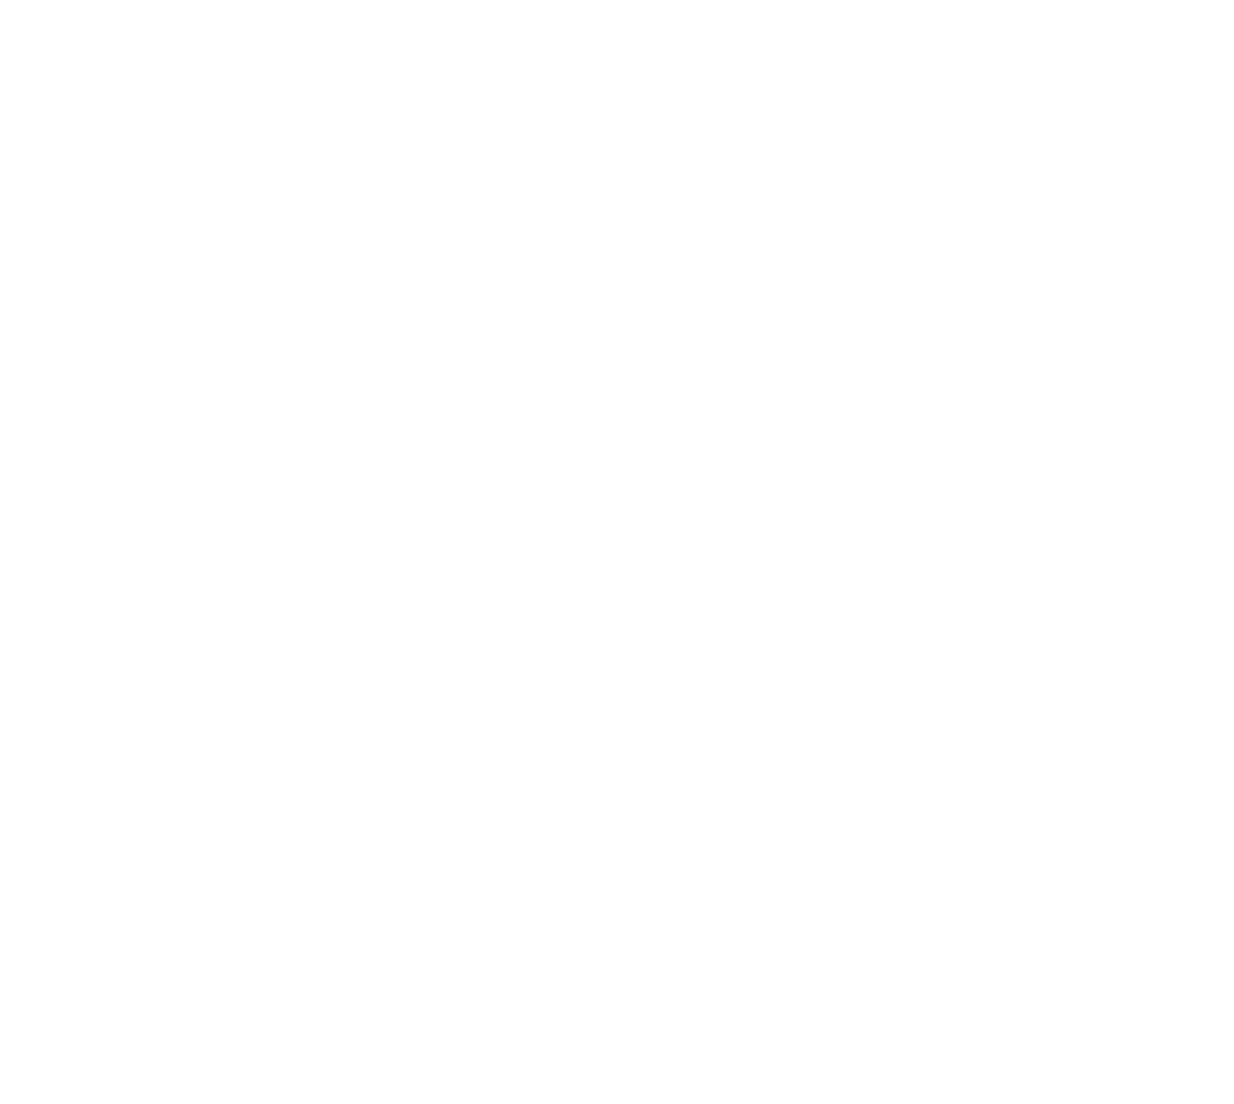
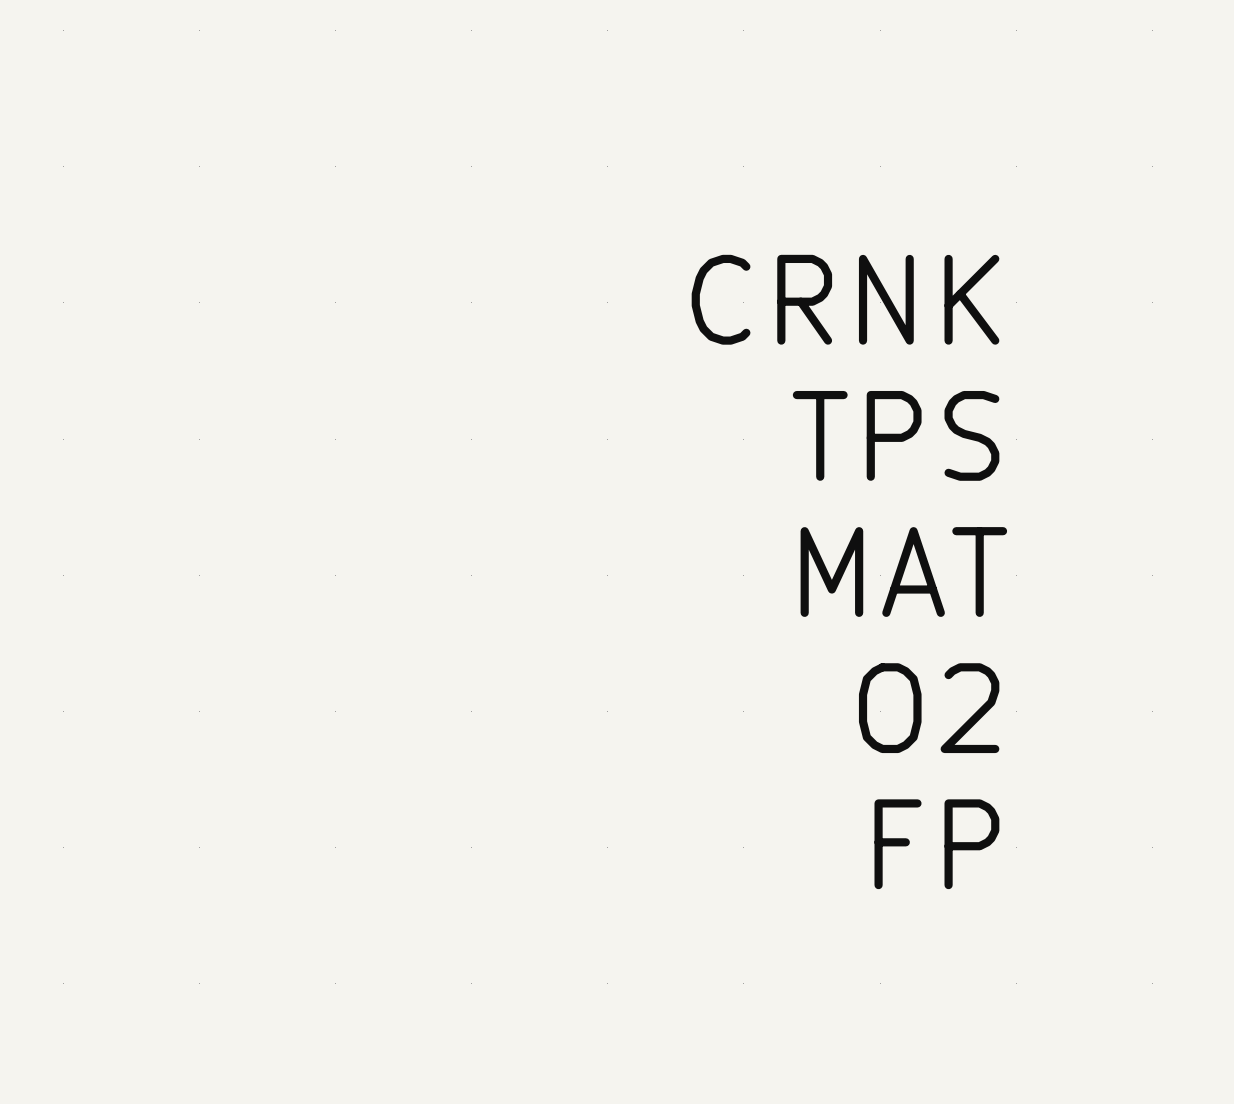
label: none -> CRNK (845, 299)
label: none -> TPS (896, 435)
label: none -> MAT (903, 572)
label: none -> O2 (929, 708)
label: none -> FP (936, 844)

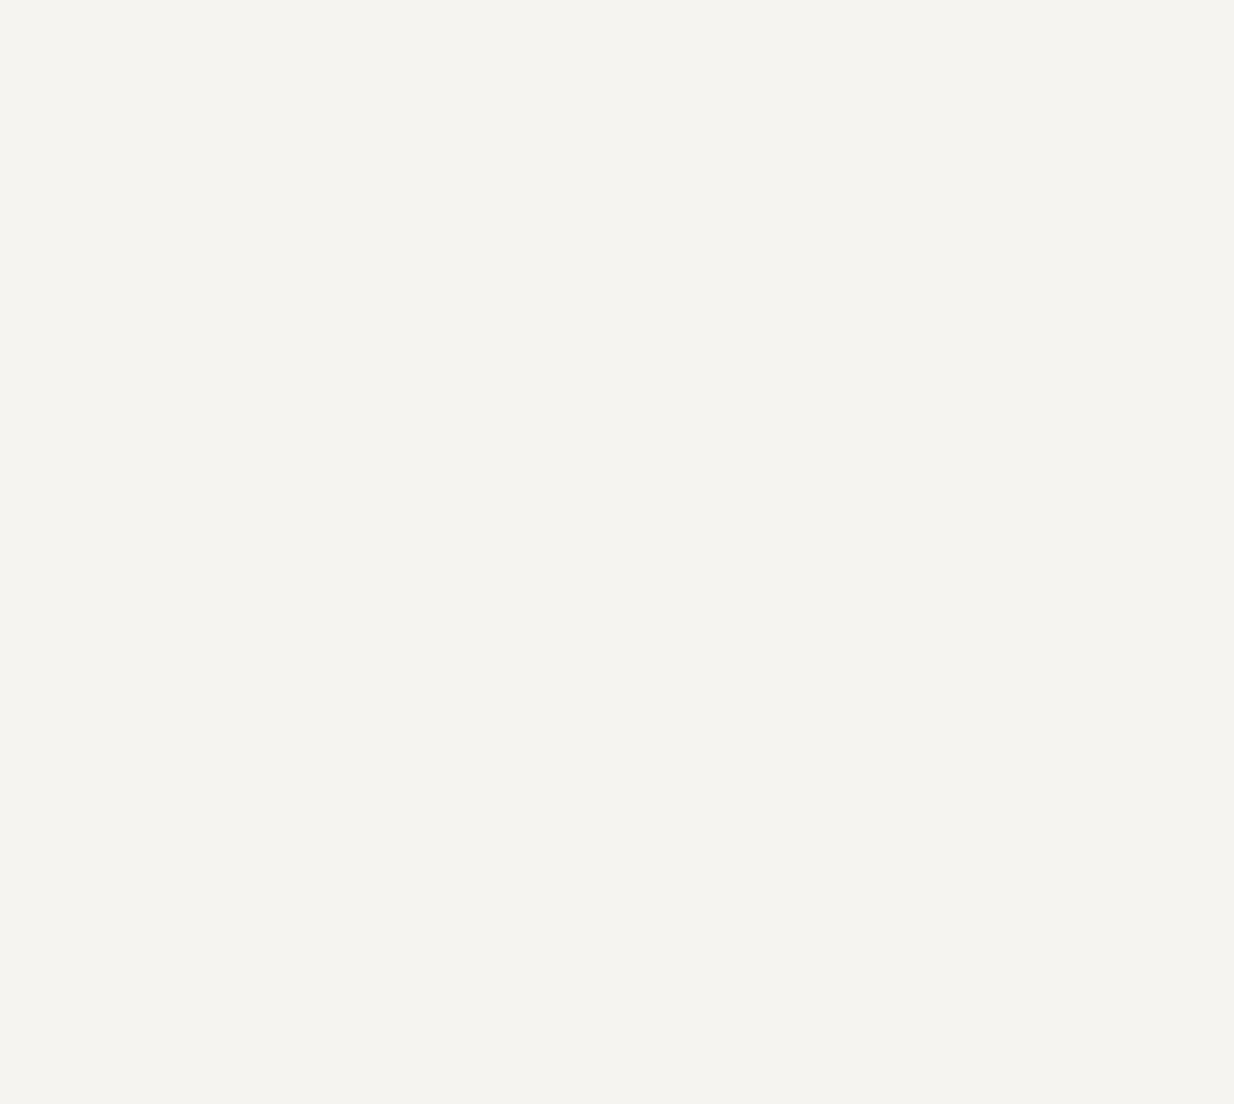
label: CRNK (845, 299) -> none
label: TPS (896, 435) -> none
label: MAT (903, 572) -> none
label: O2 (929, 708) -> none
label: FP (936, 844) -> none

